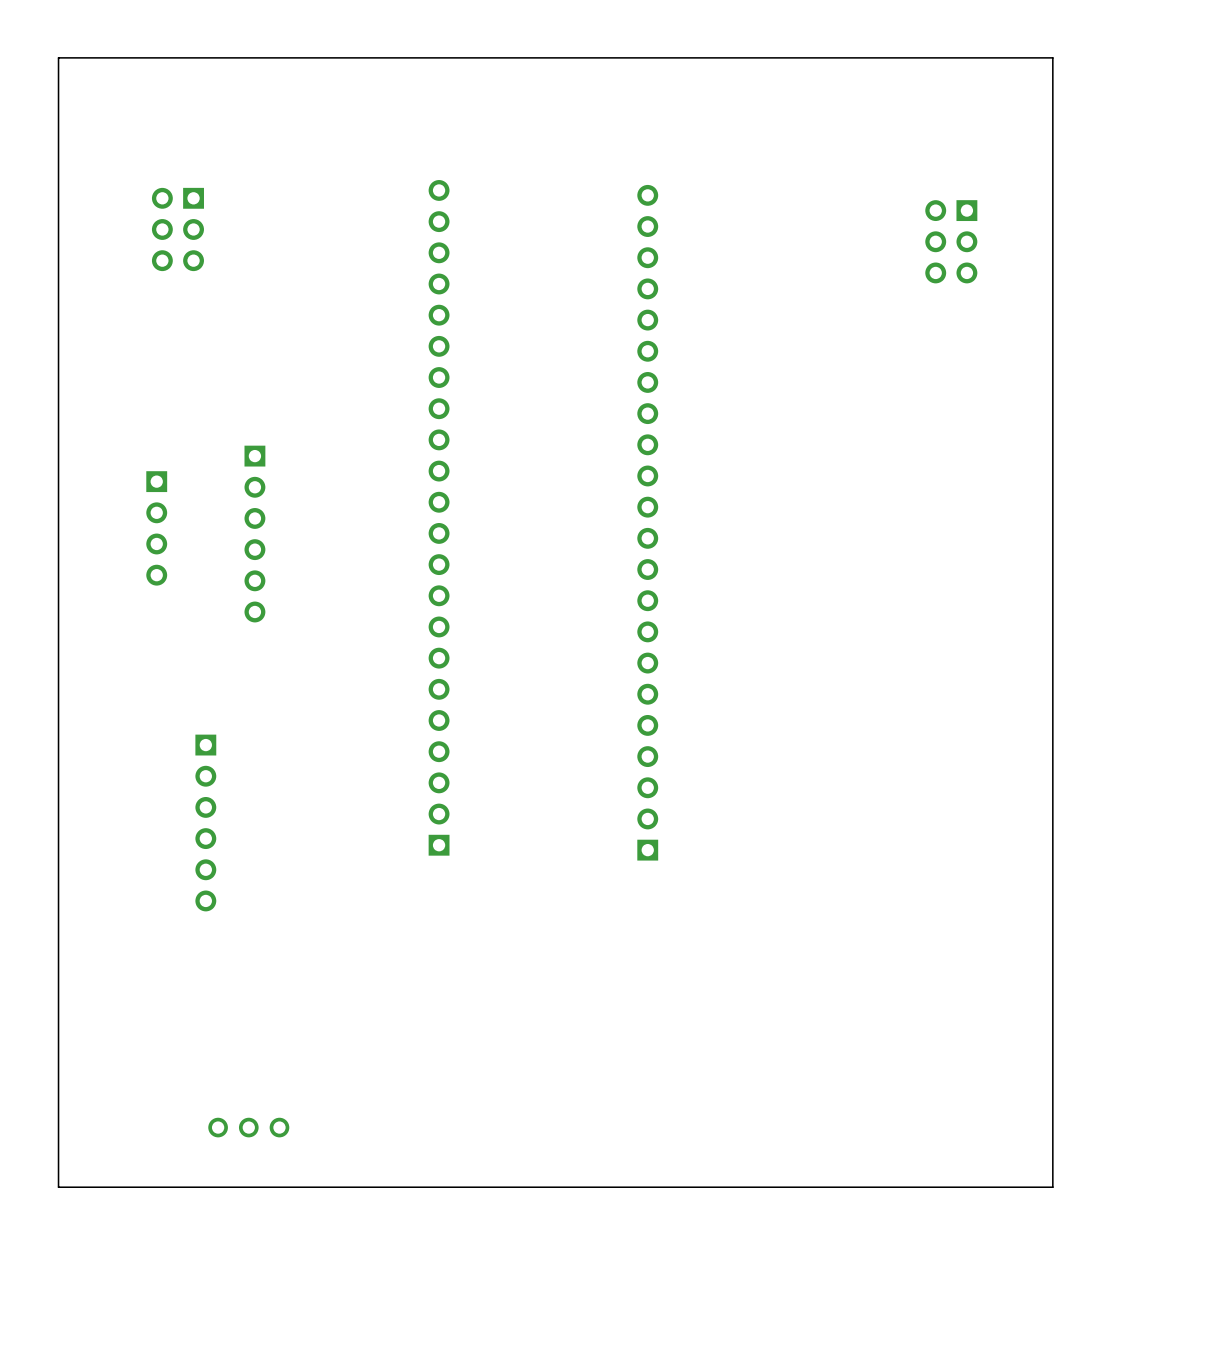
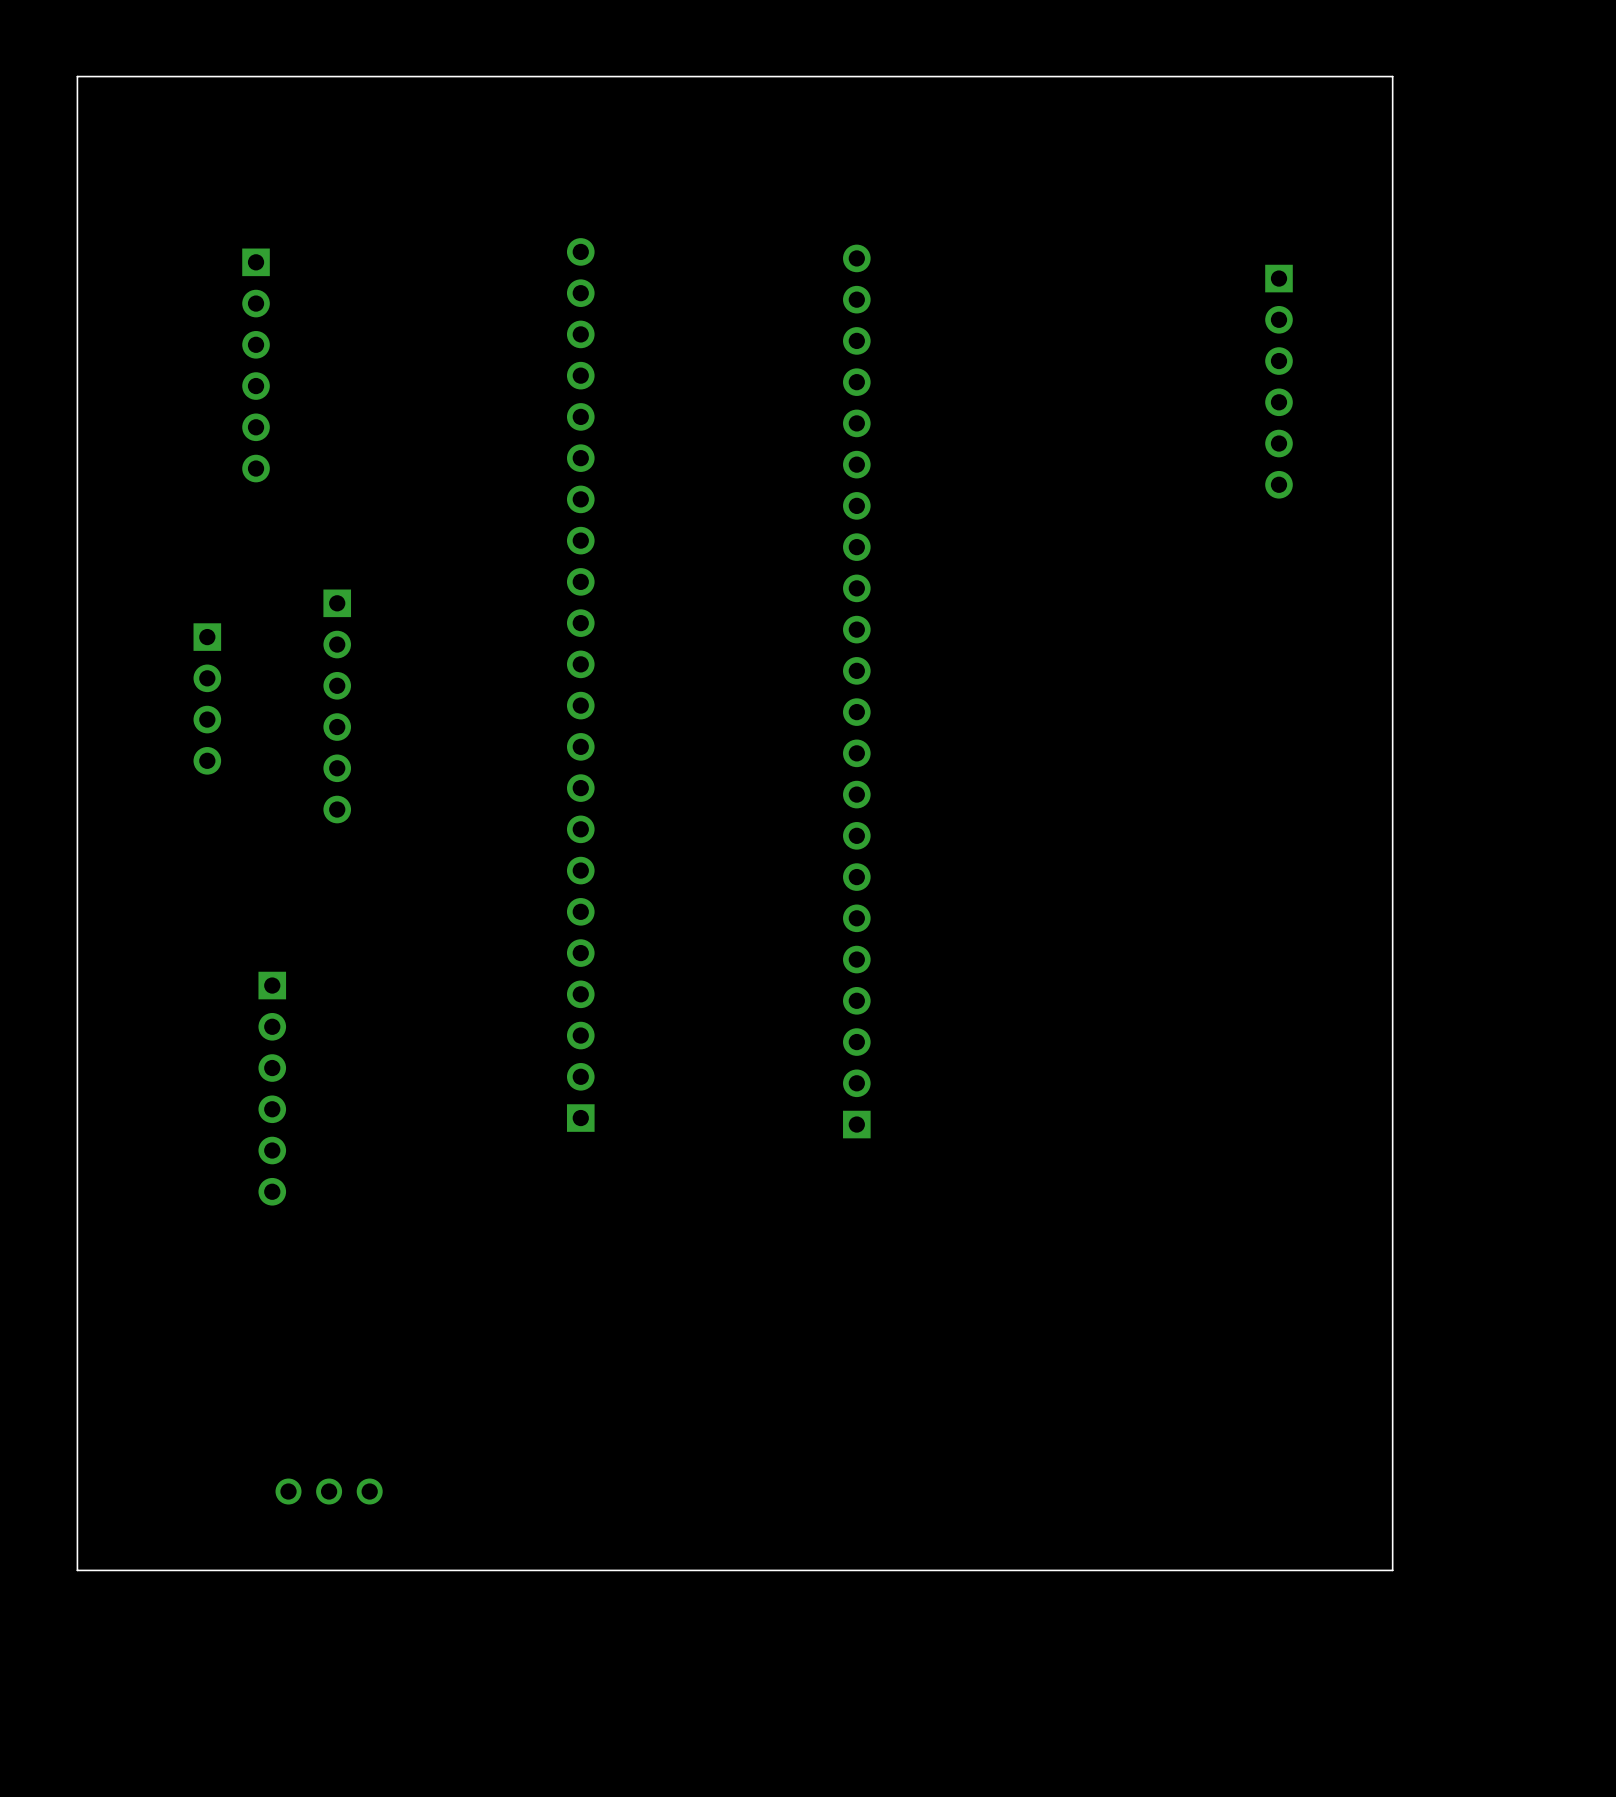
part: (177, 229) -> none
part: (951, 241) -> none
part: none -> (256, 365)
part: none -> (1279, 381)

